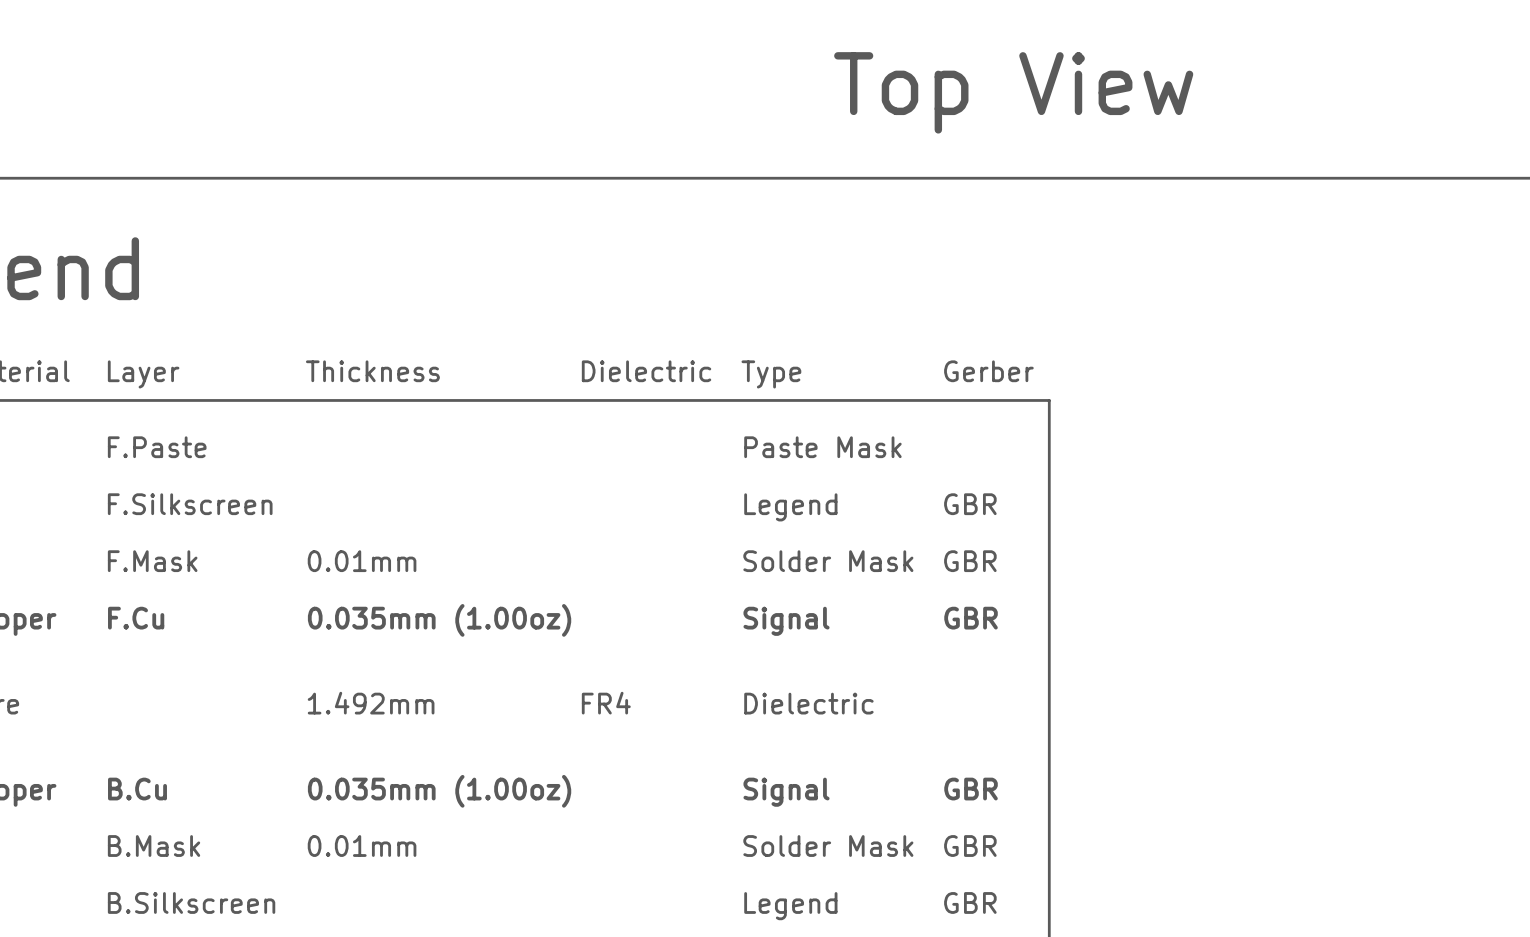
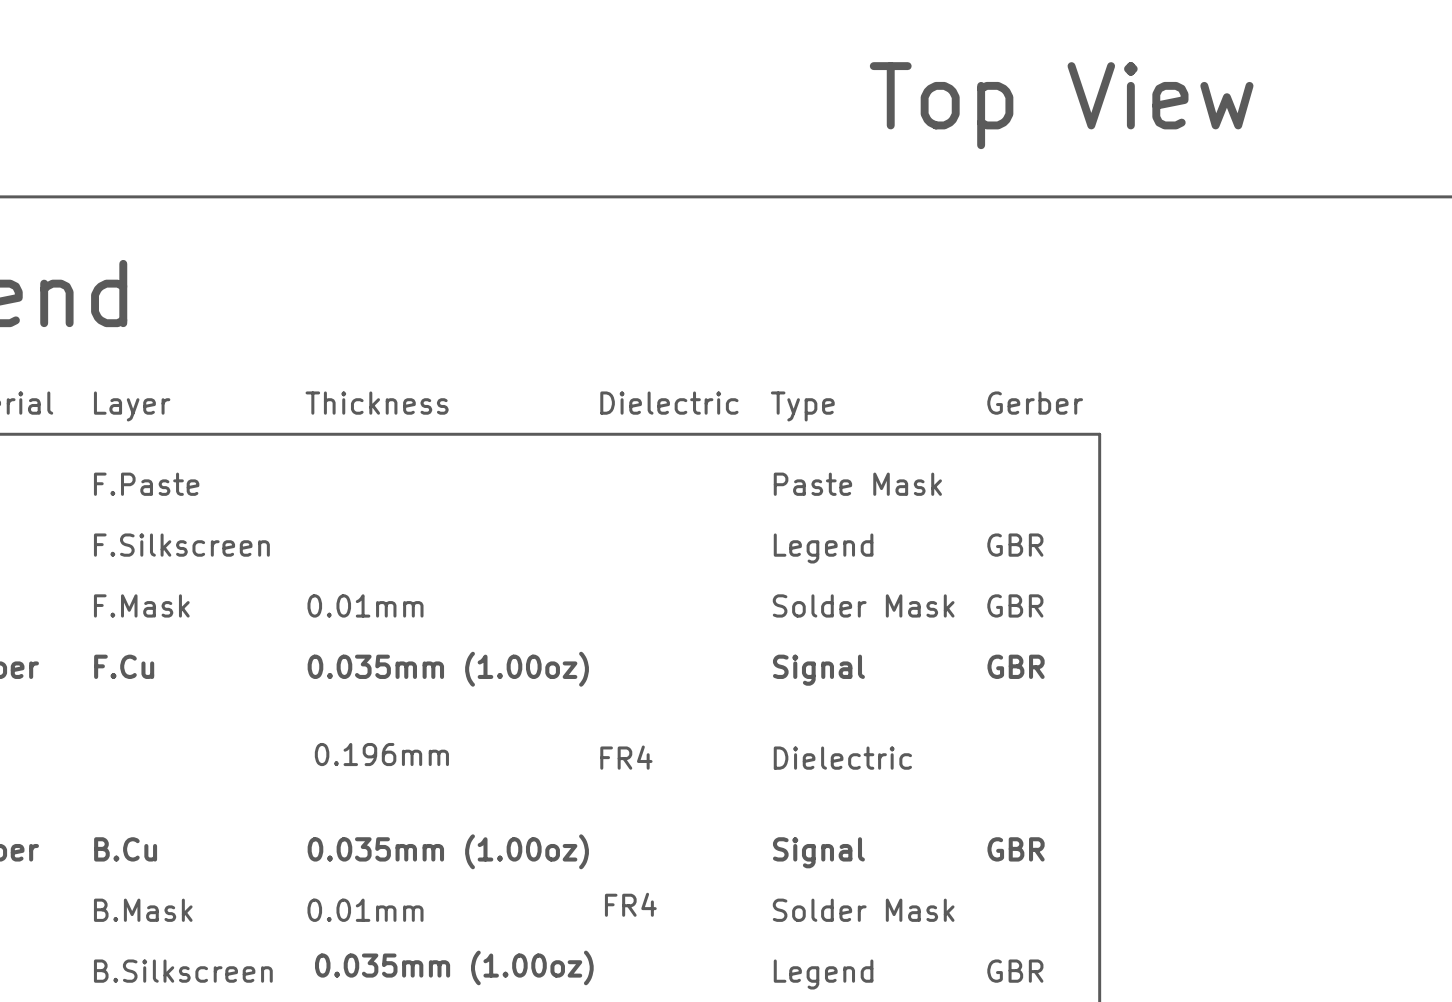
text: 1.492mm (371, 703) -> 0.196mm (381, 754)
text: none -> FR4 (630, 904)
text: GBR (970, 846) -> none
text: none -> 0.035mm (1.00oz) (454, 967)

